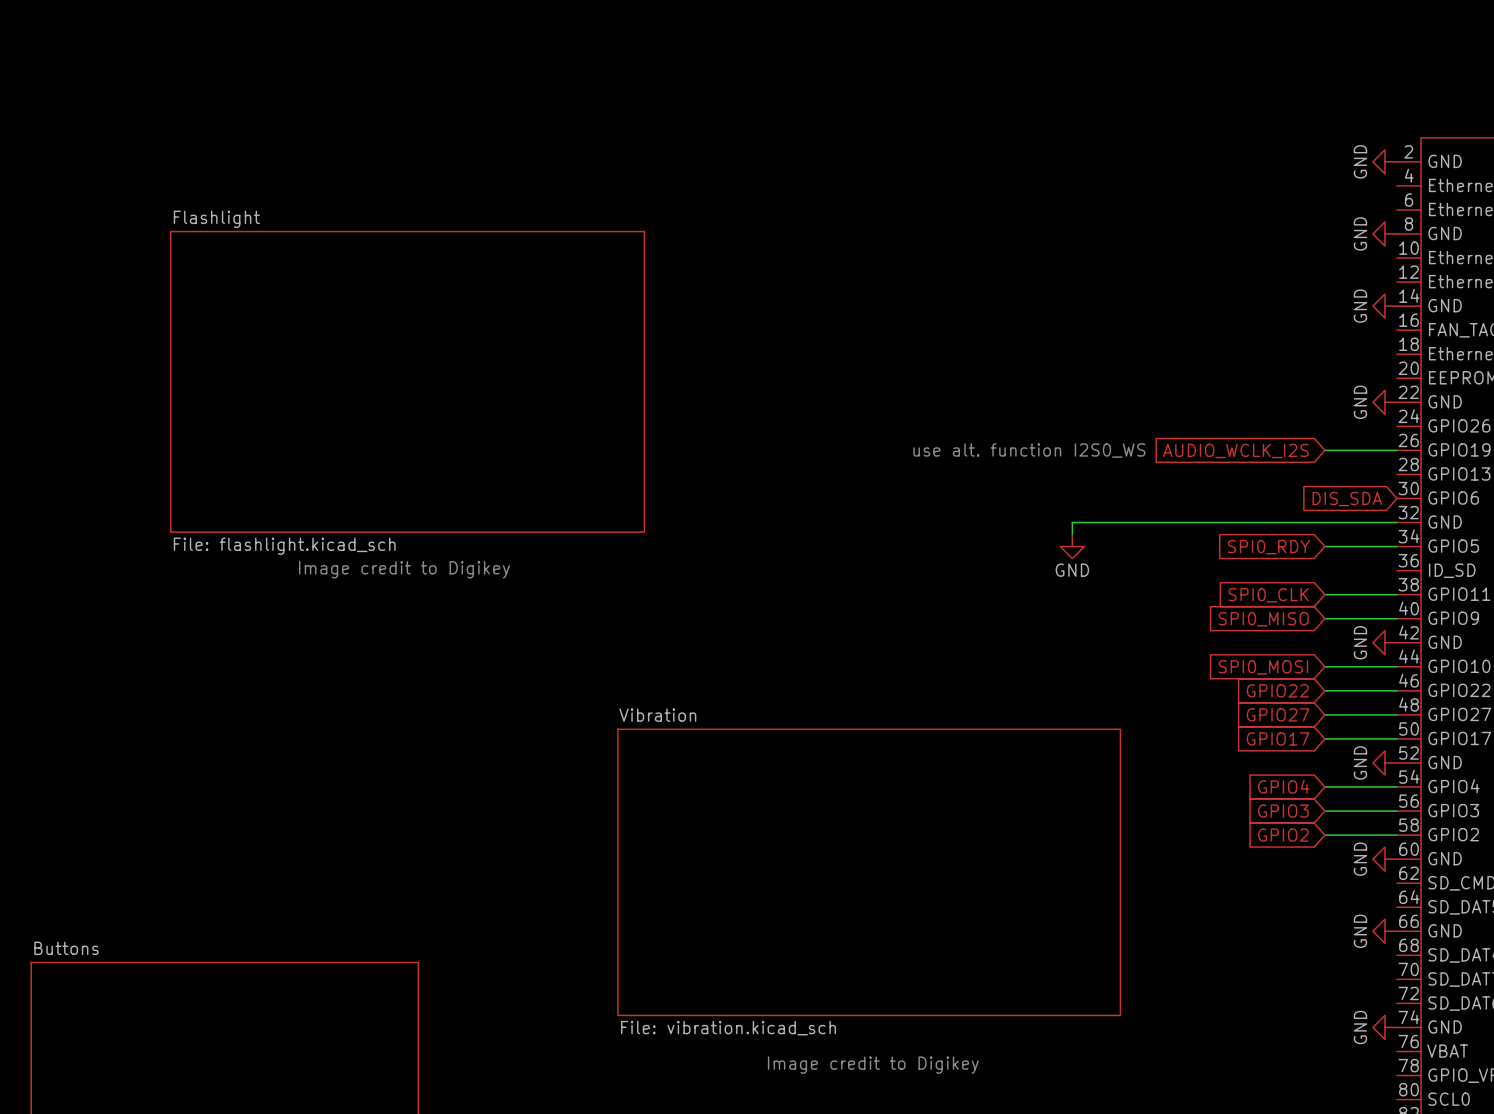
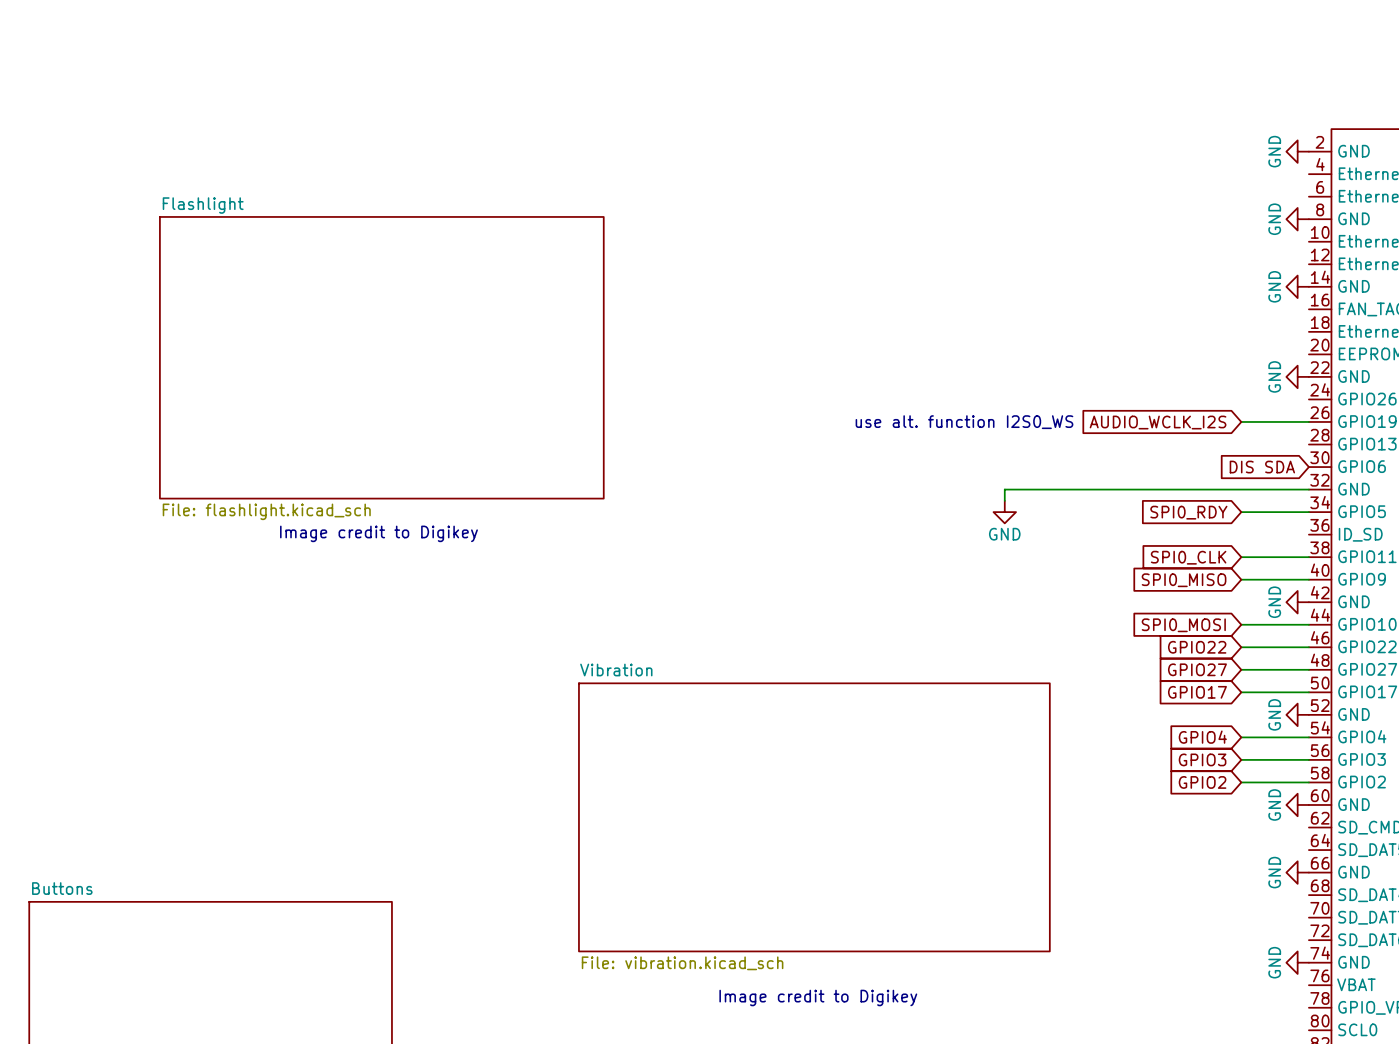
global label: DIS_SDA (1347, 499) -> DIS SDA (1262, 467)

